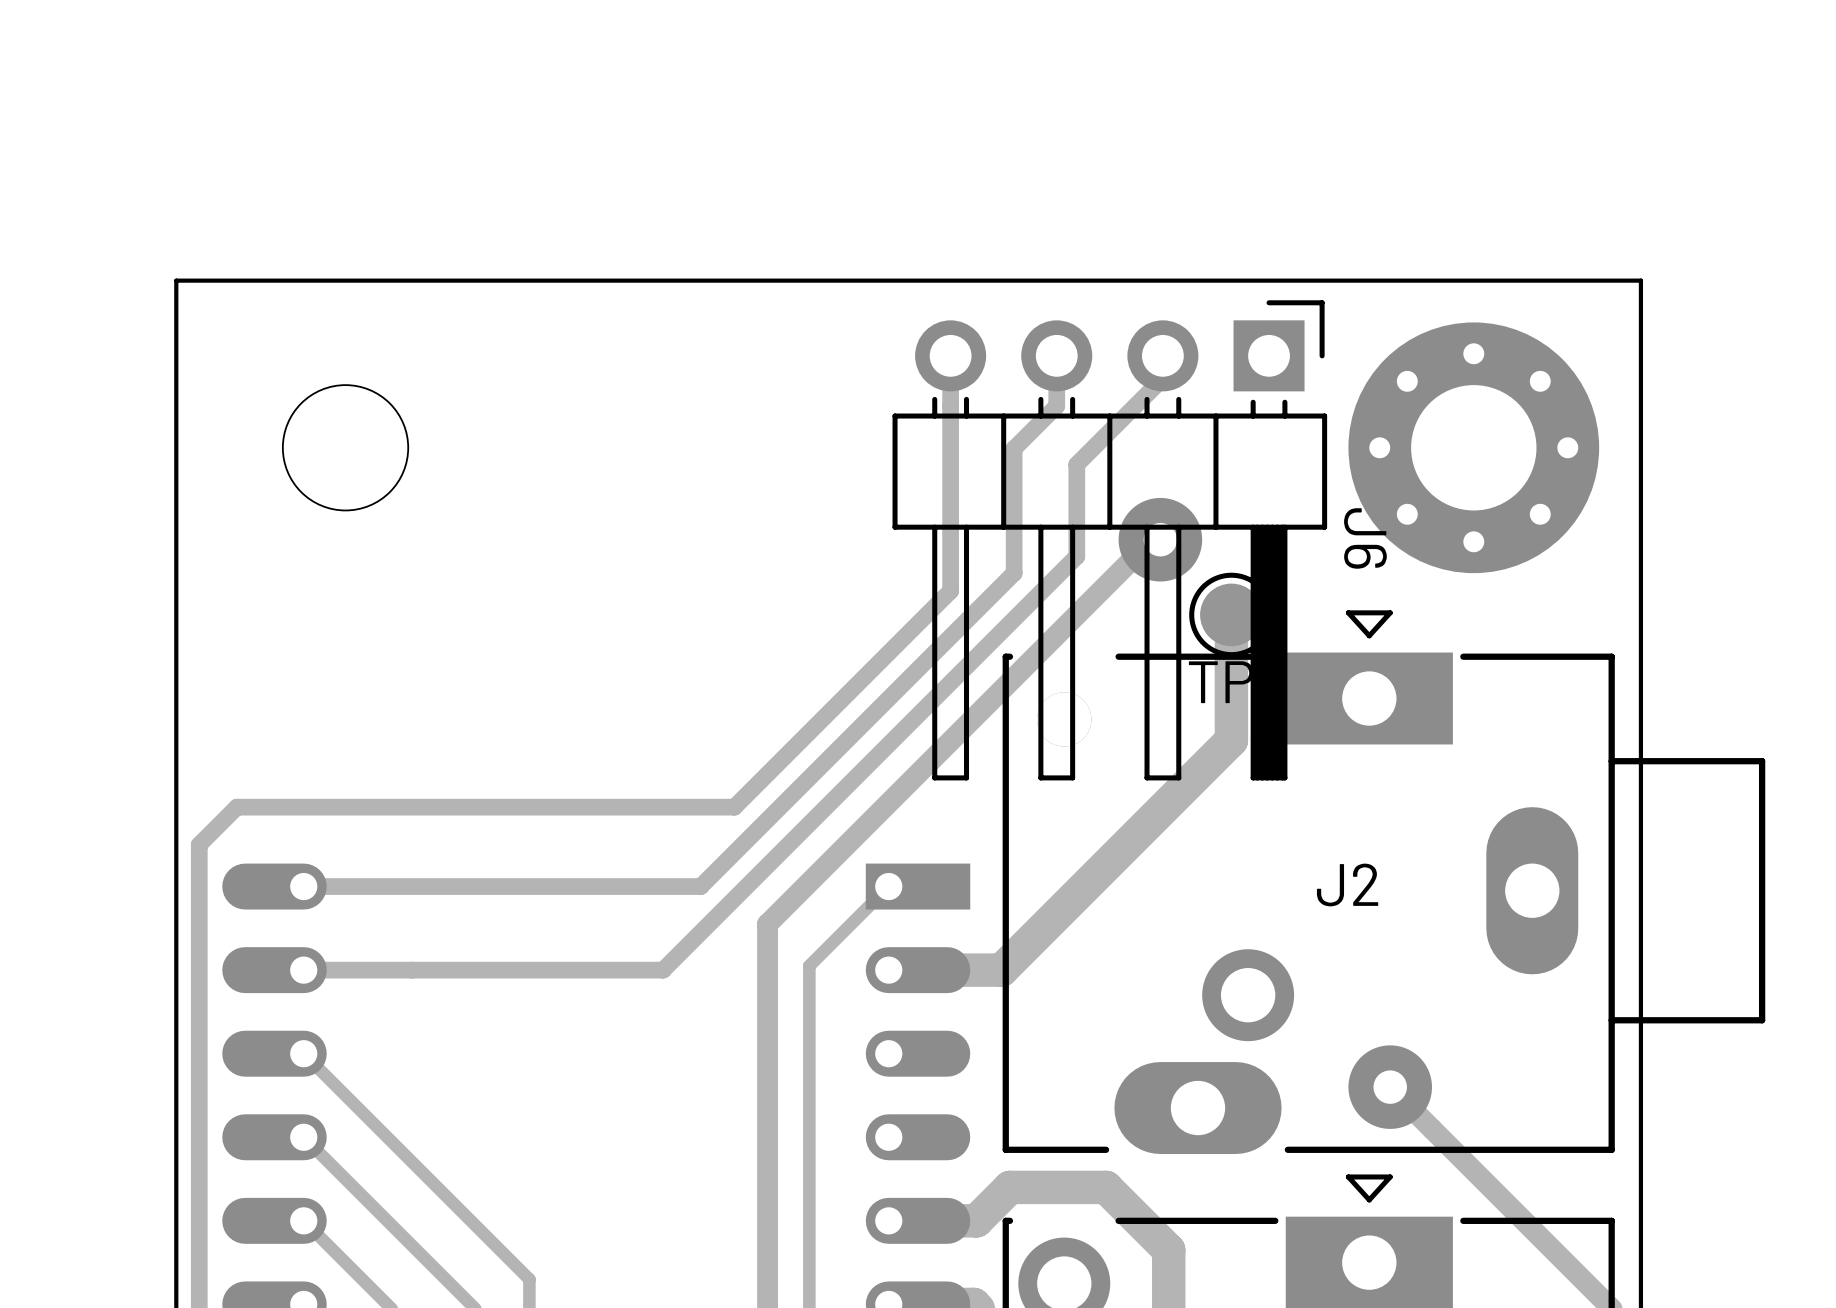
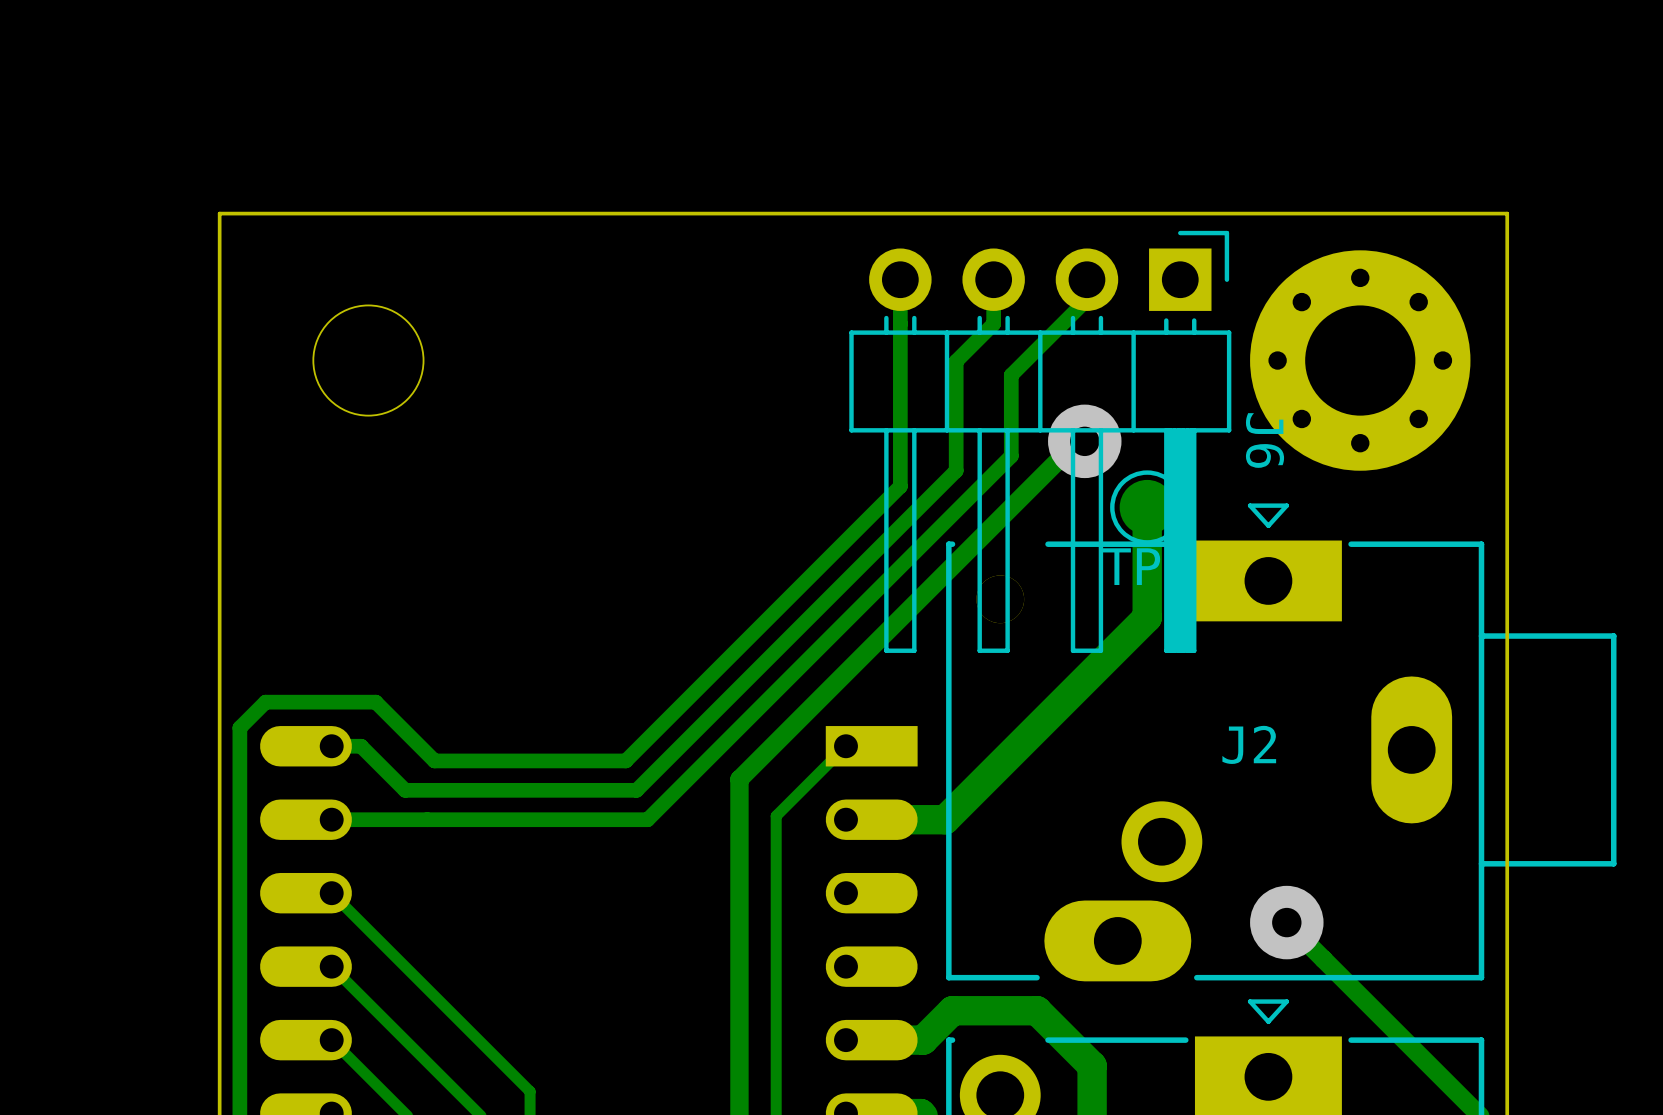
track: (734, 807) (236, 807) (199, 844) (199, 865) -> (710, 676) (625, 760) (434, 760) (375, 702) (265, 702) (239, 727)
track: (700, 886) (337, 886) -> (680, 746) (636, 790) (405, 790) (361, 746)

